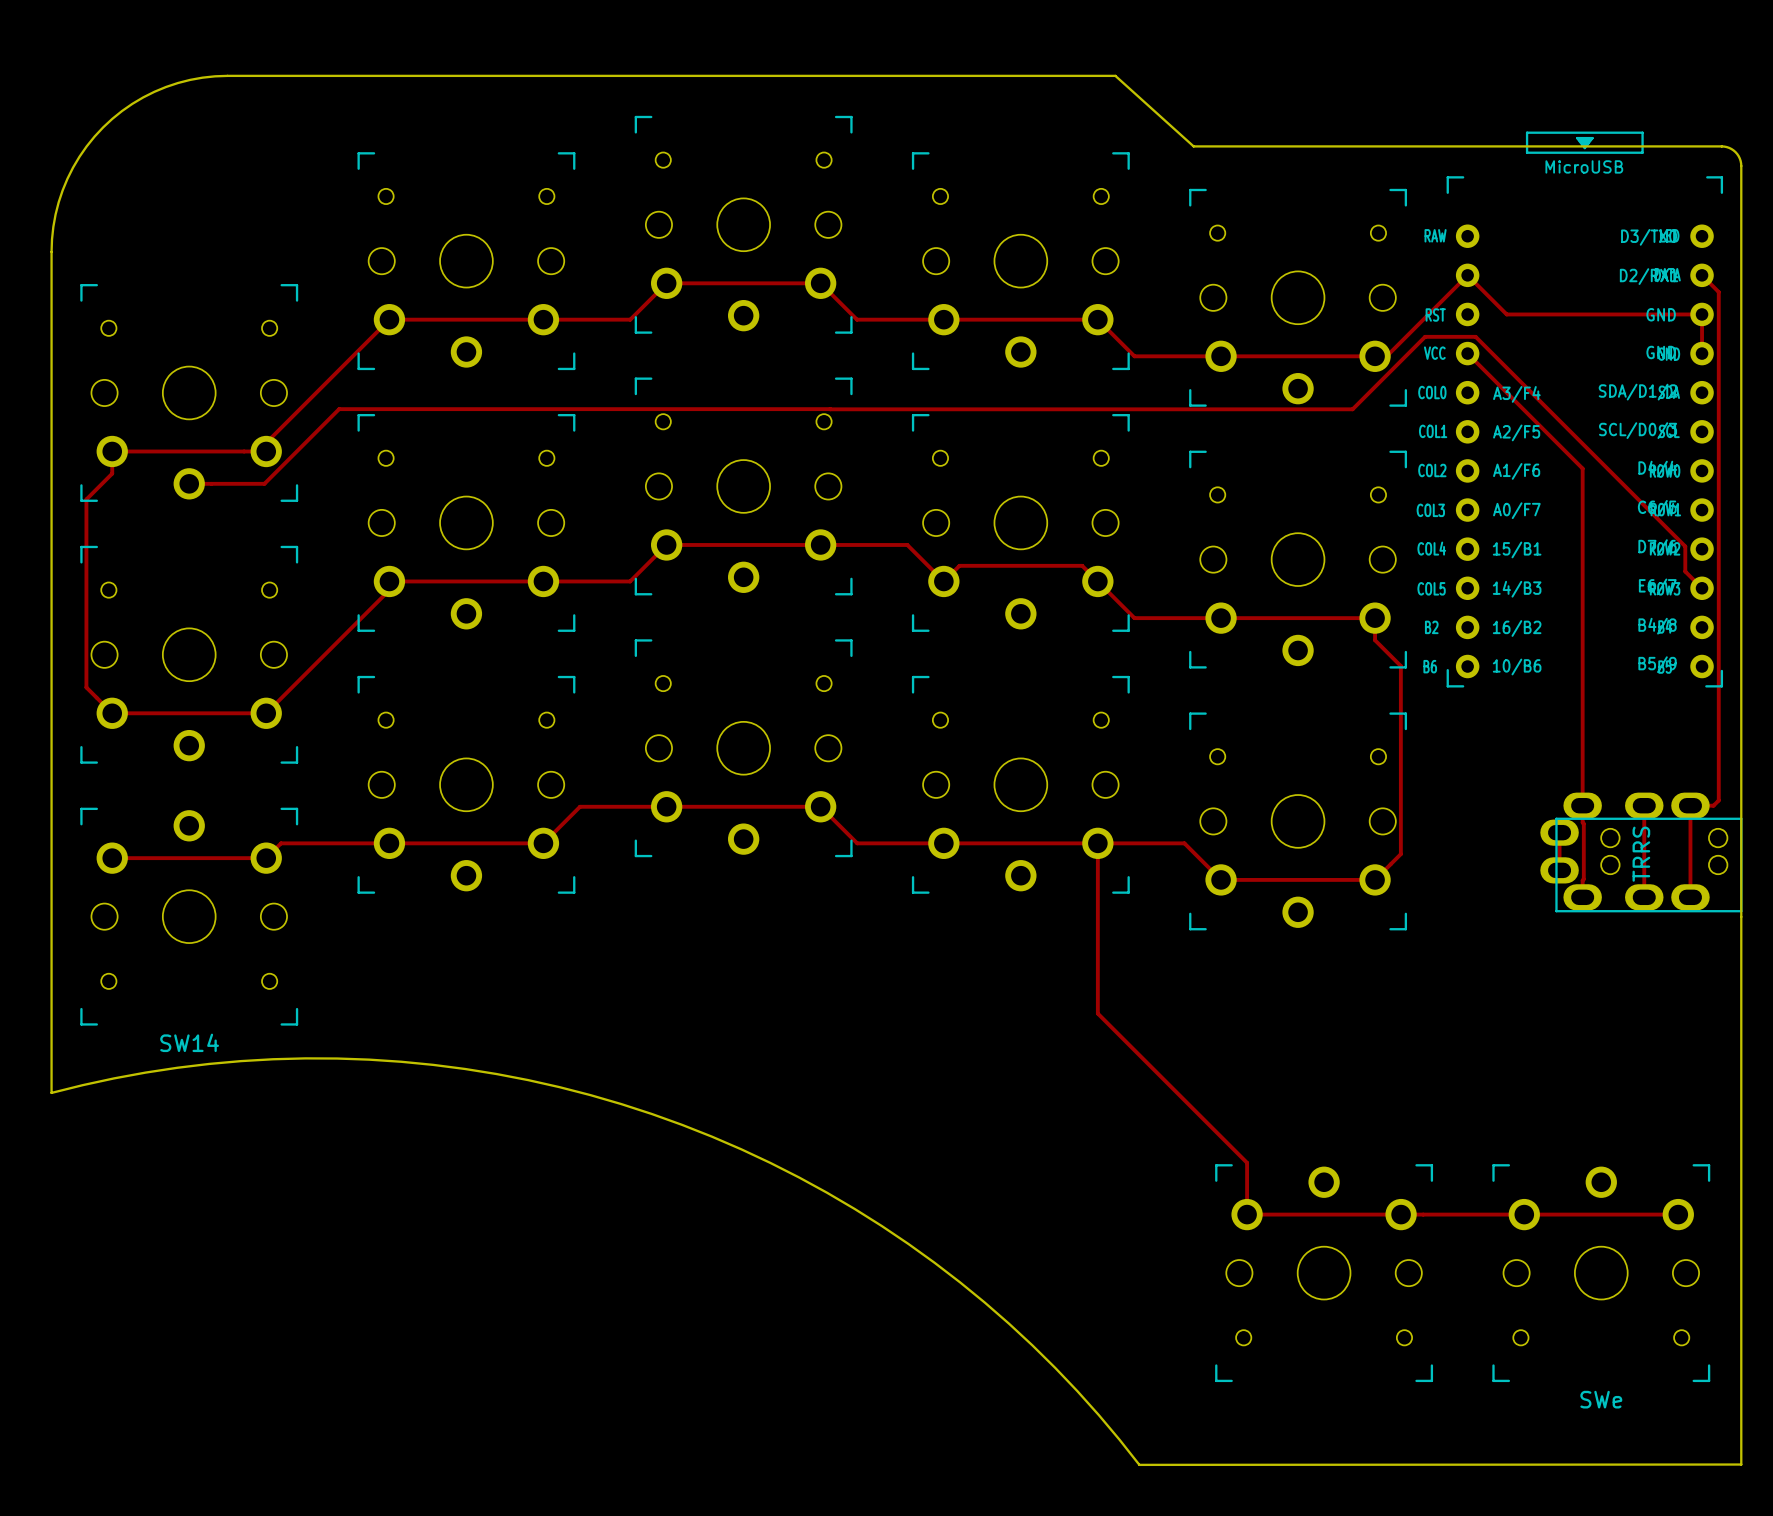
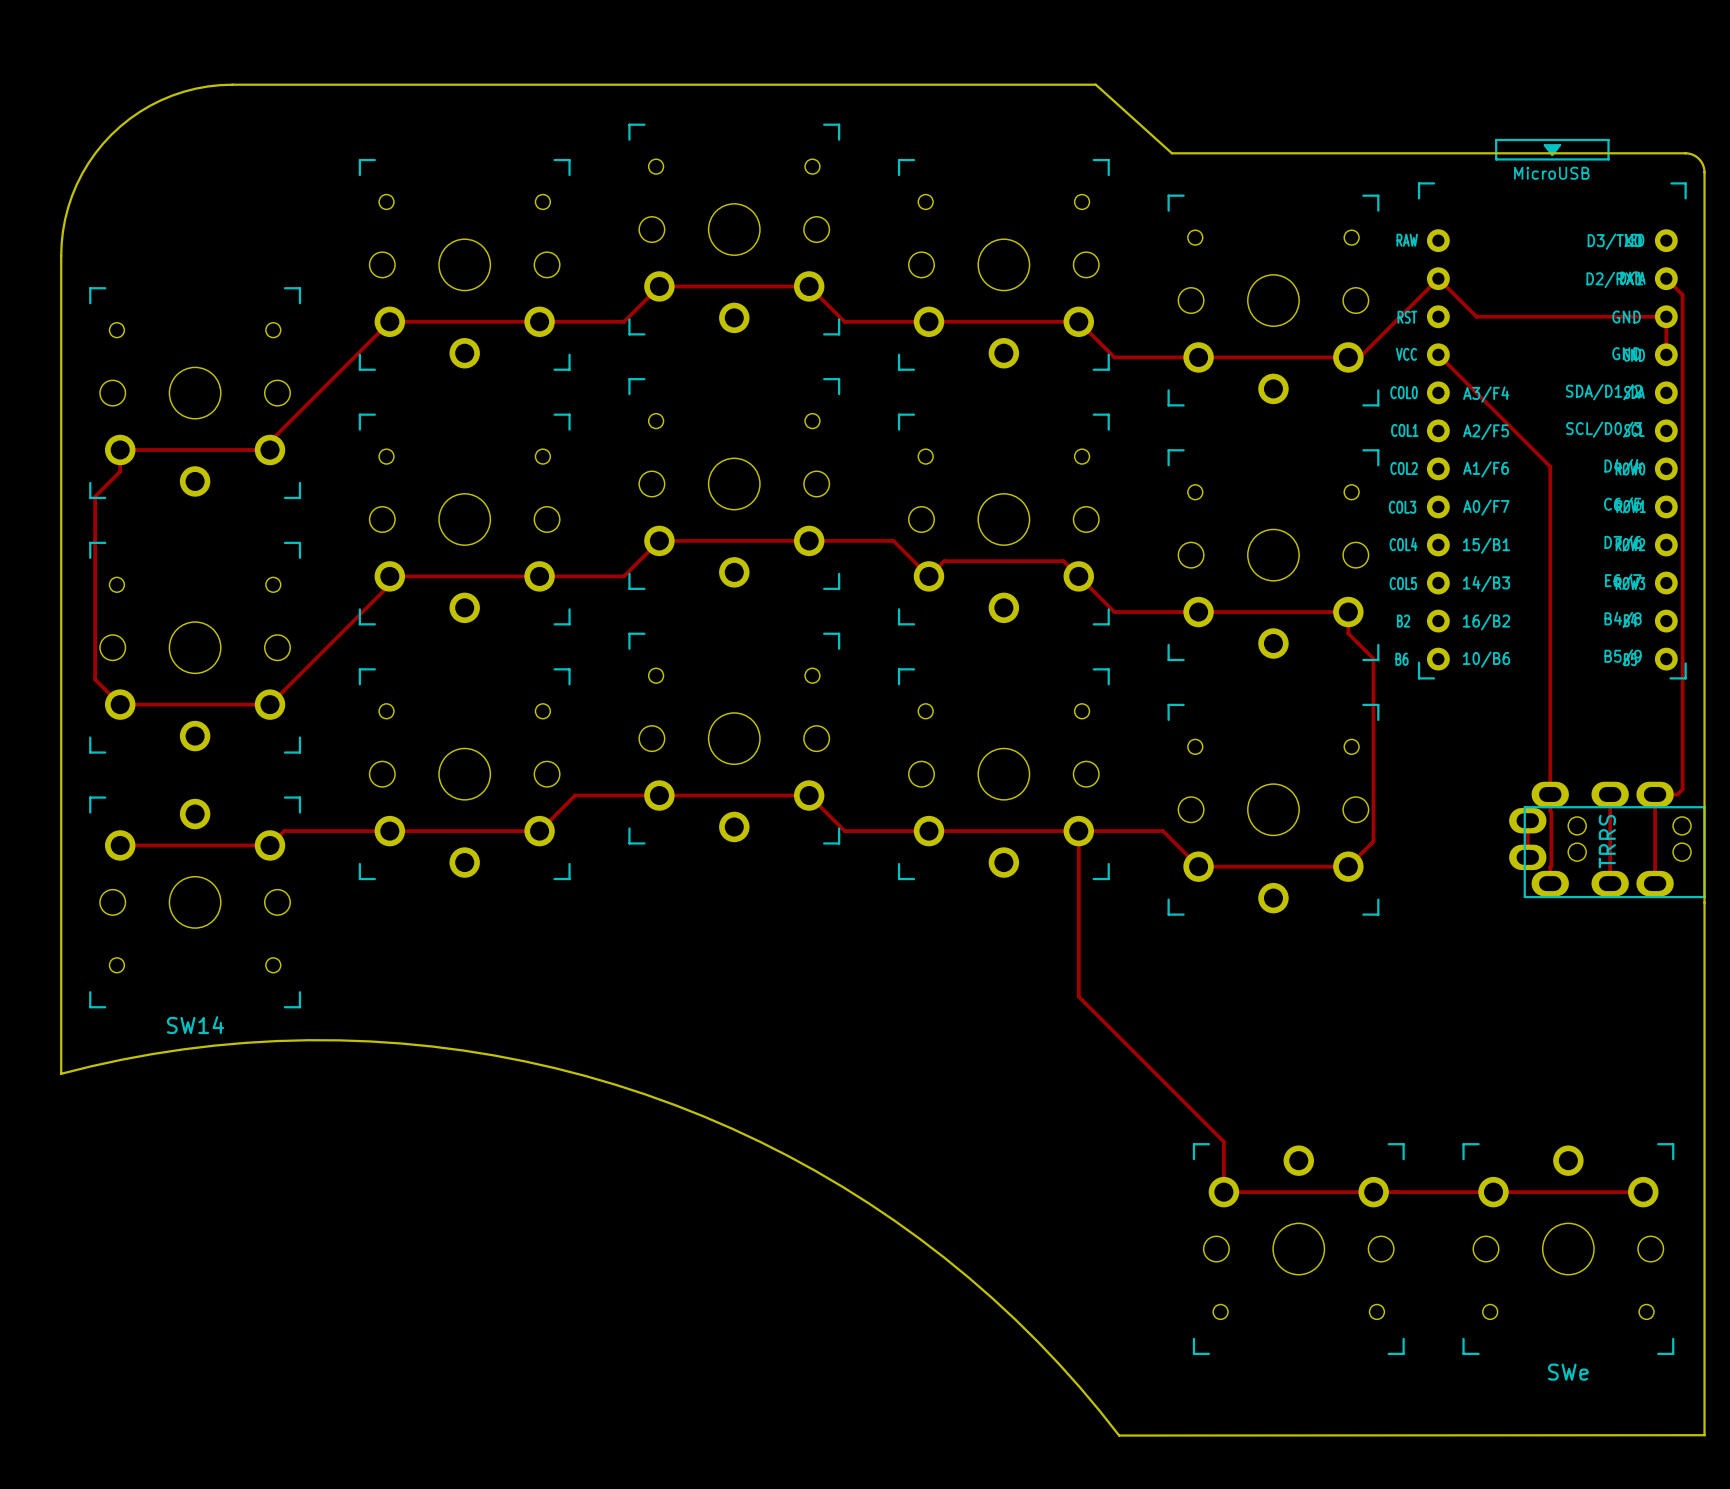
track: (830, 409) (339, 409) (264, 483) (189, 483) -> none
track: (830, 409) (1352, 409) (1425, 336) (1475, 336) (1685, 546) (1685, 571) (1702, 588) -> none

